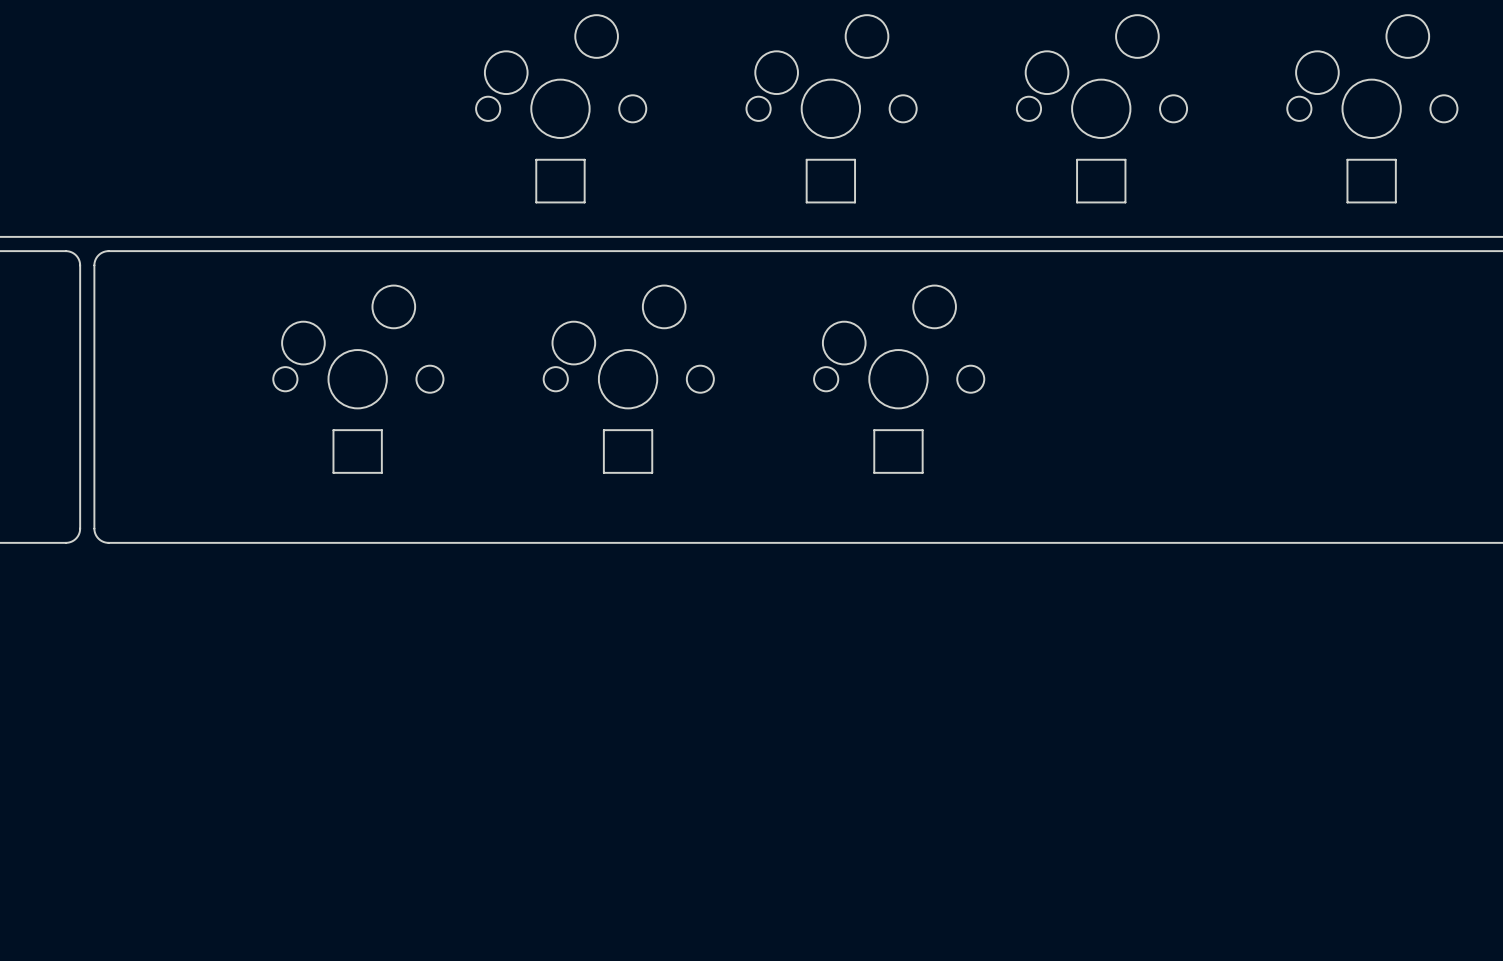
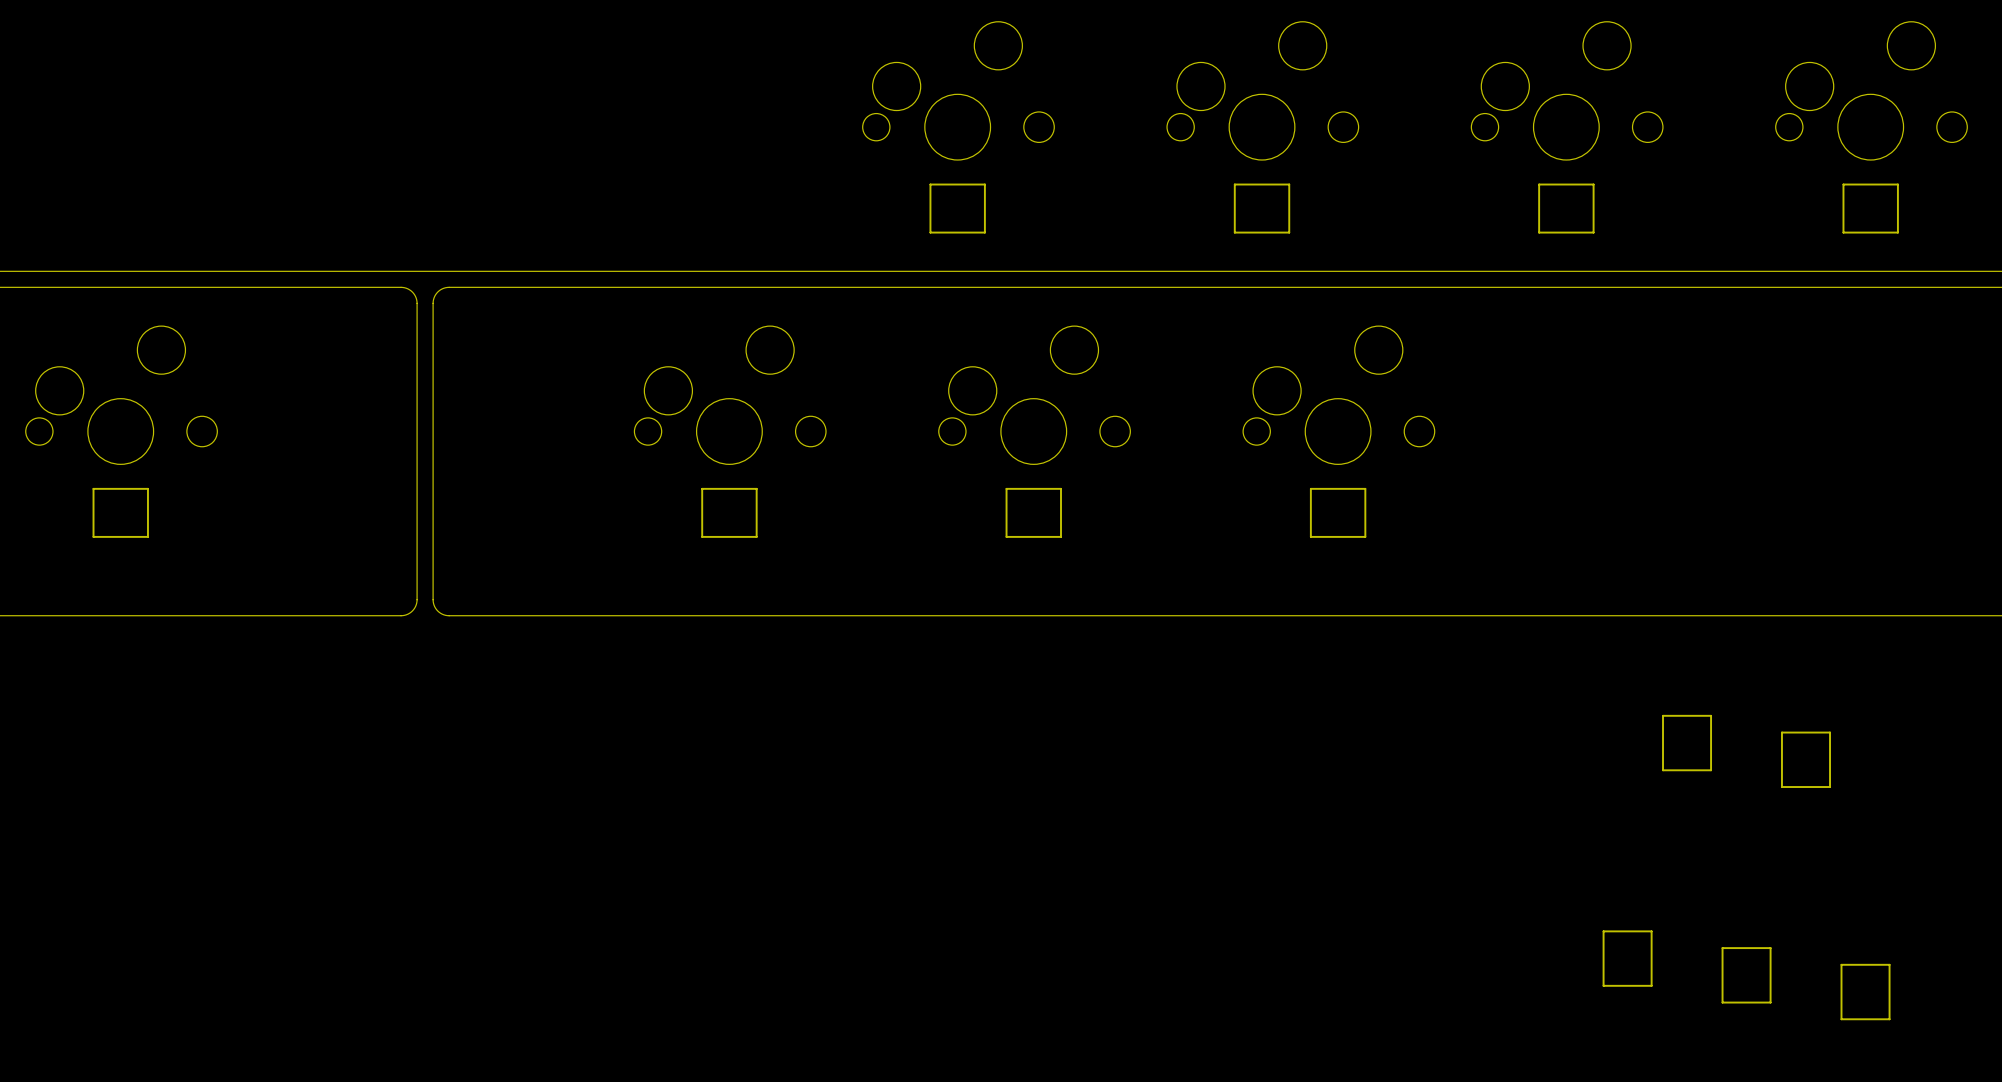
part: none -> (1687, 743)
part: none -> (1805, 759)
part: none -> (1627, 958)
part: none -> (1746, 975)
part: none -> (1865, 992)

